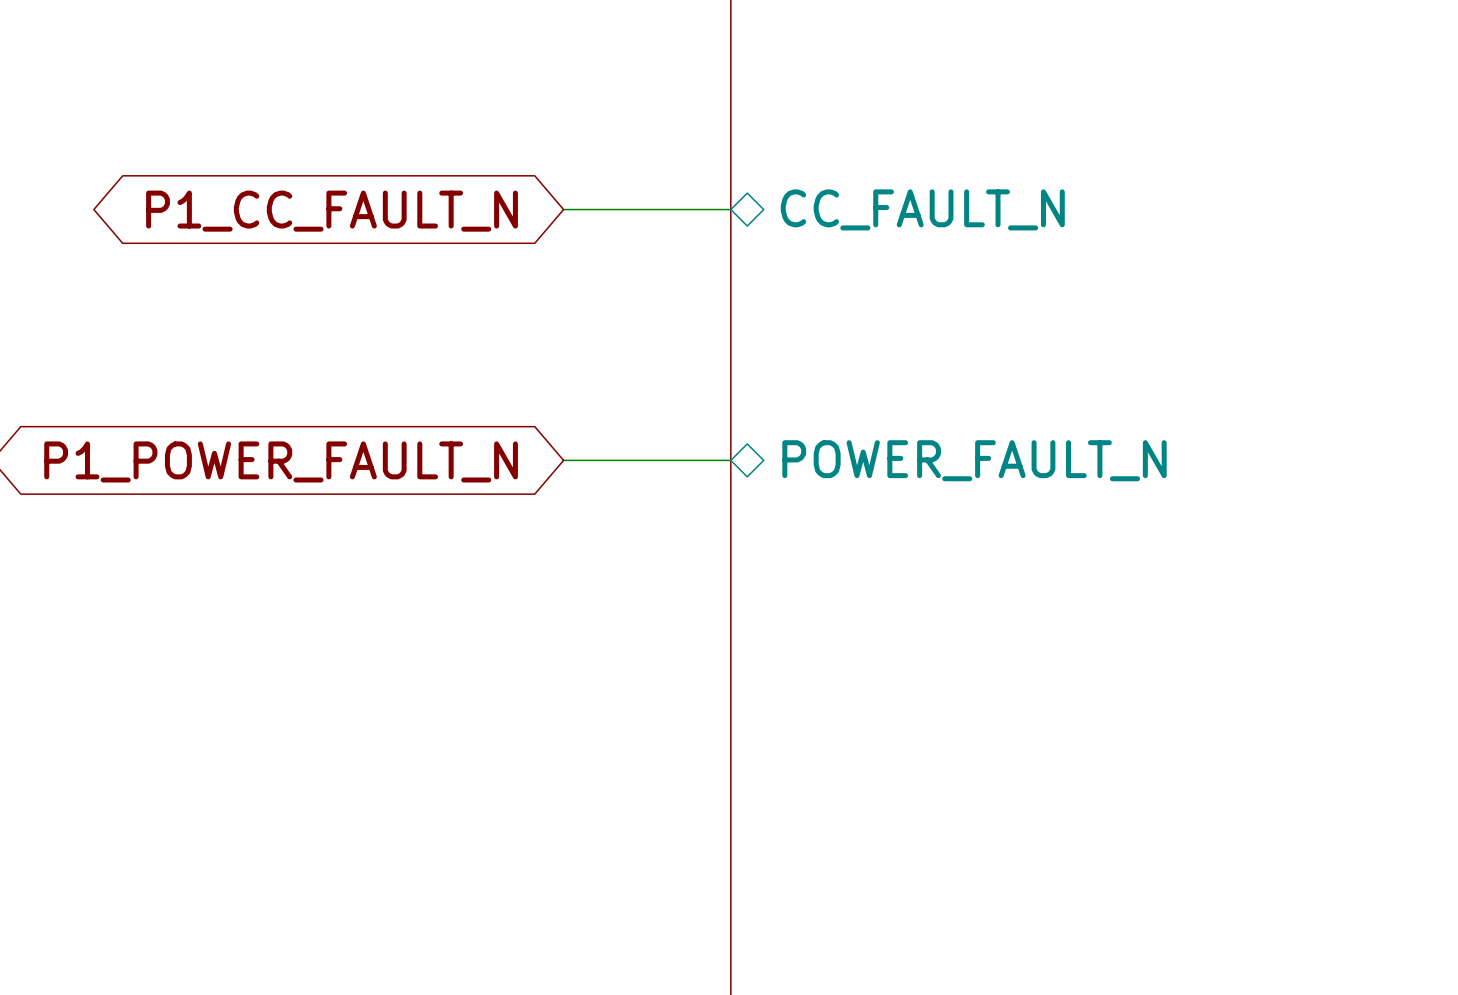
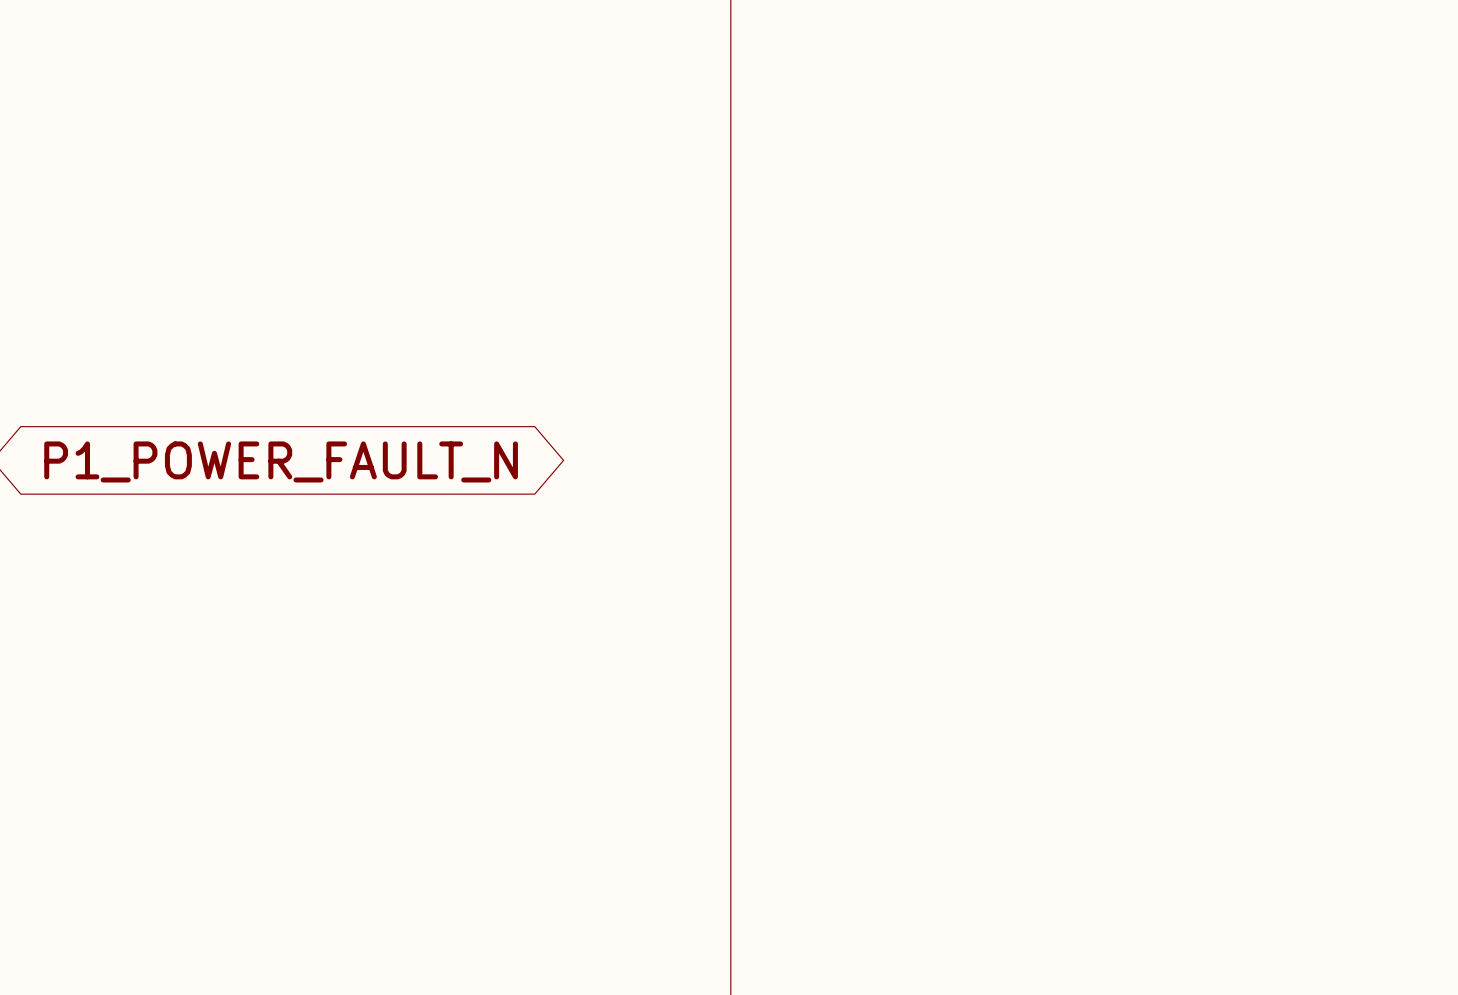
wire: (563, 209) (730, 209) -> none
sheet pin: CC_FAULT_N (922, 209) -> none
global label: P1_CC_FAULT_N (332, 211) -> none
wire: (563, 460) (730, 460) -> none
sheet pin: POWER_FAULT_N (974, 460) -> none

